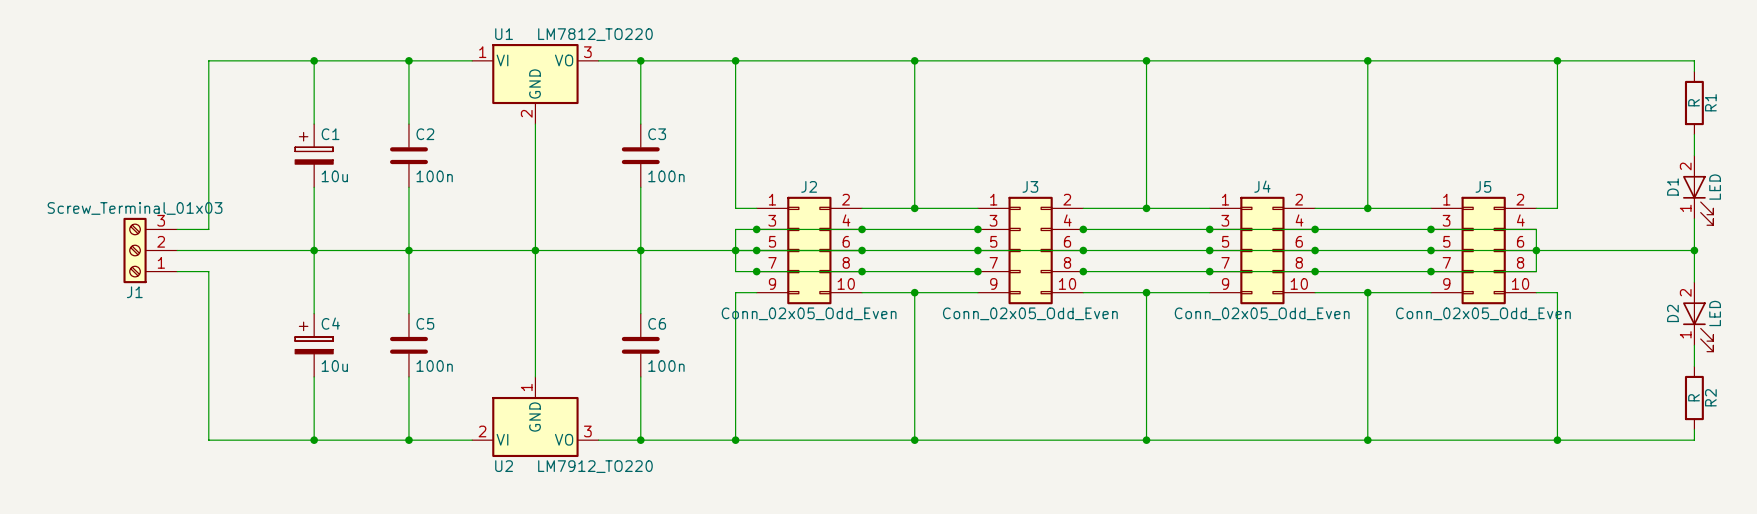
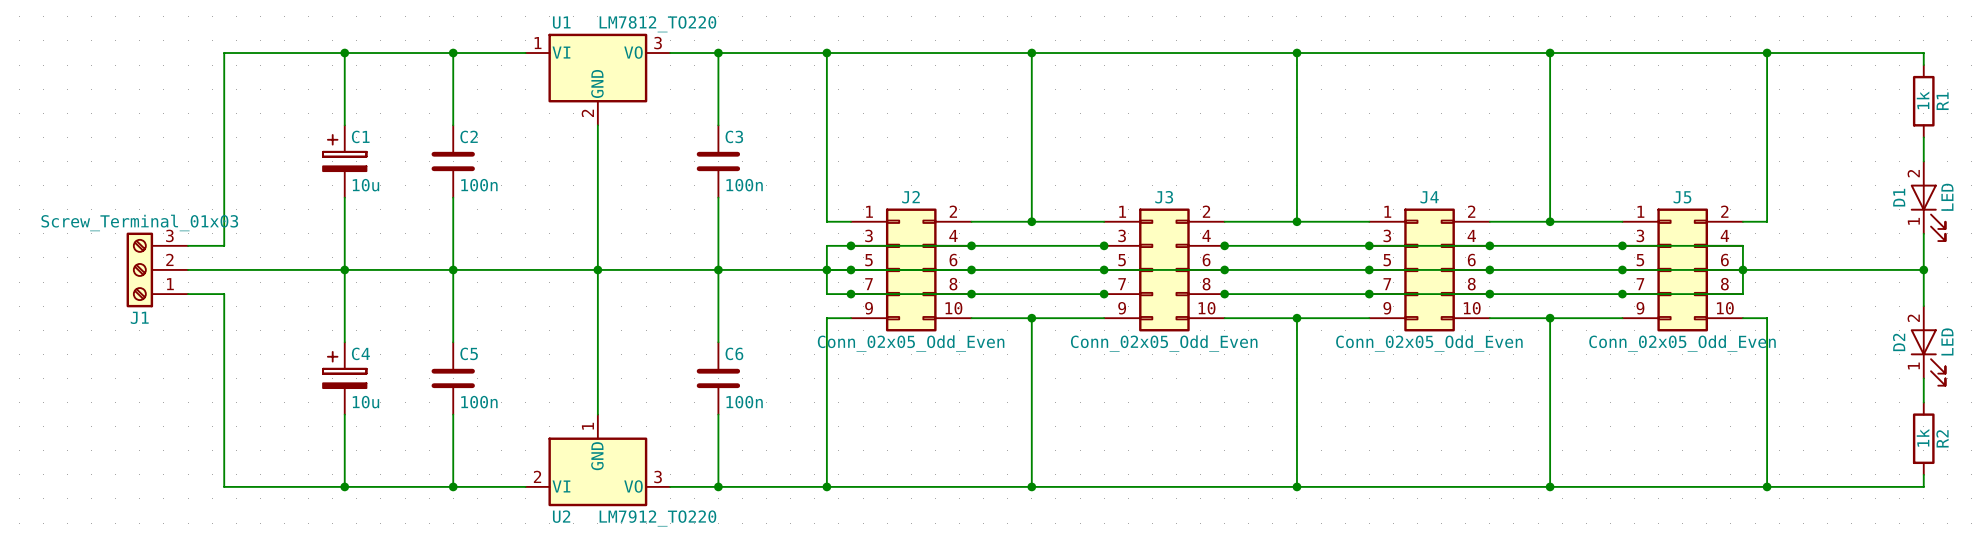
R1 value: R (1694, 102) -> 1k (1923, 100)
R2 value: R (1694, 397) -> 1k (1923, 437)

